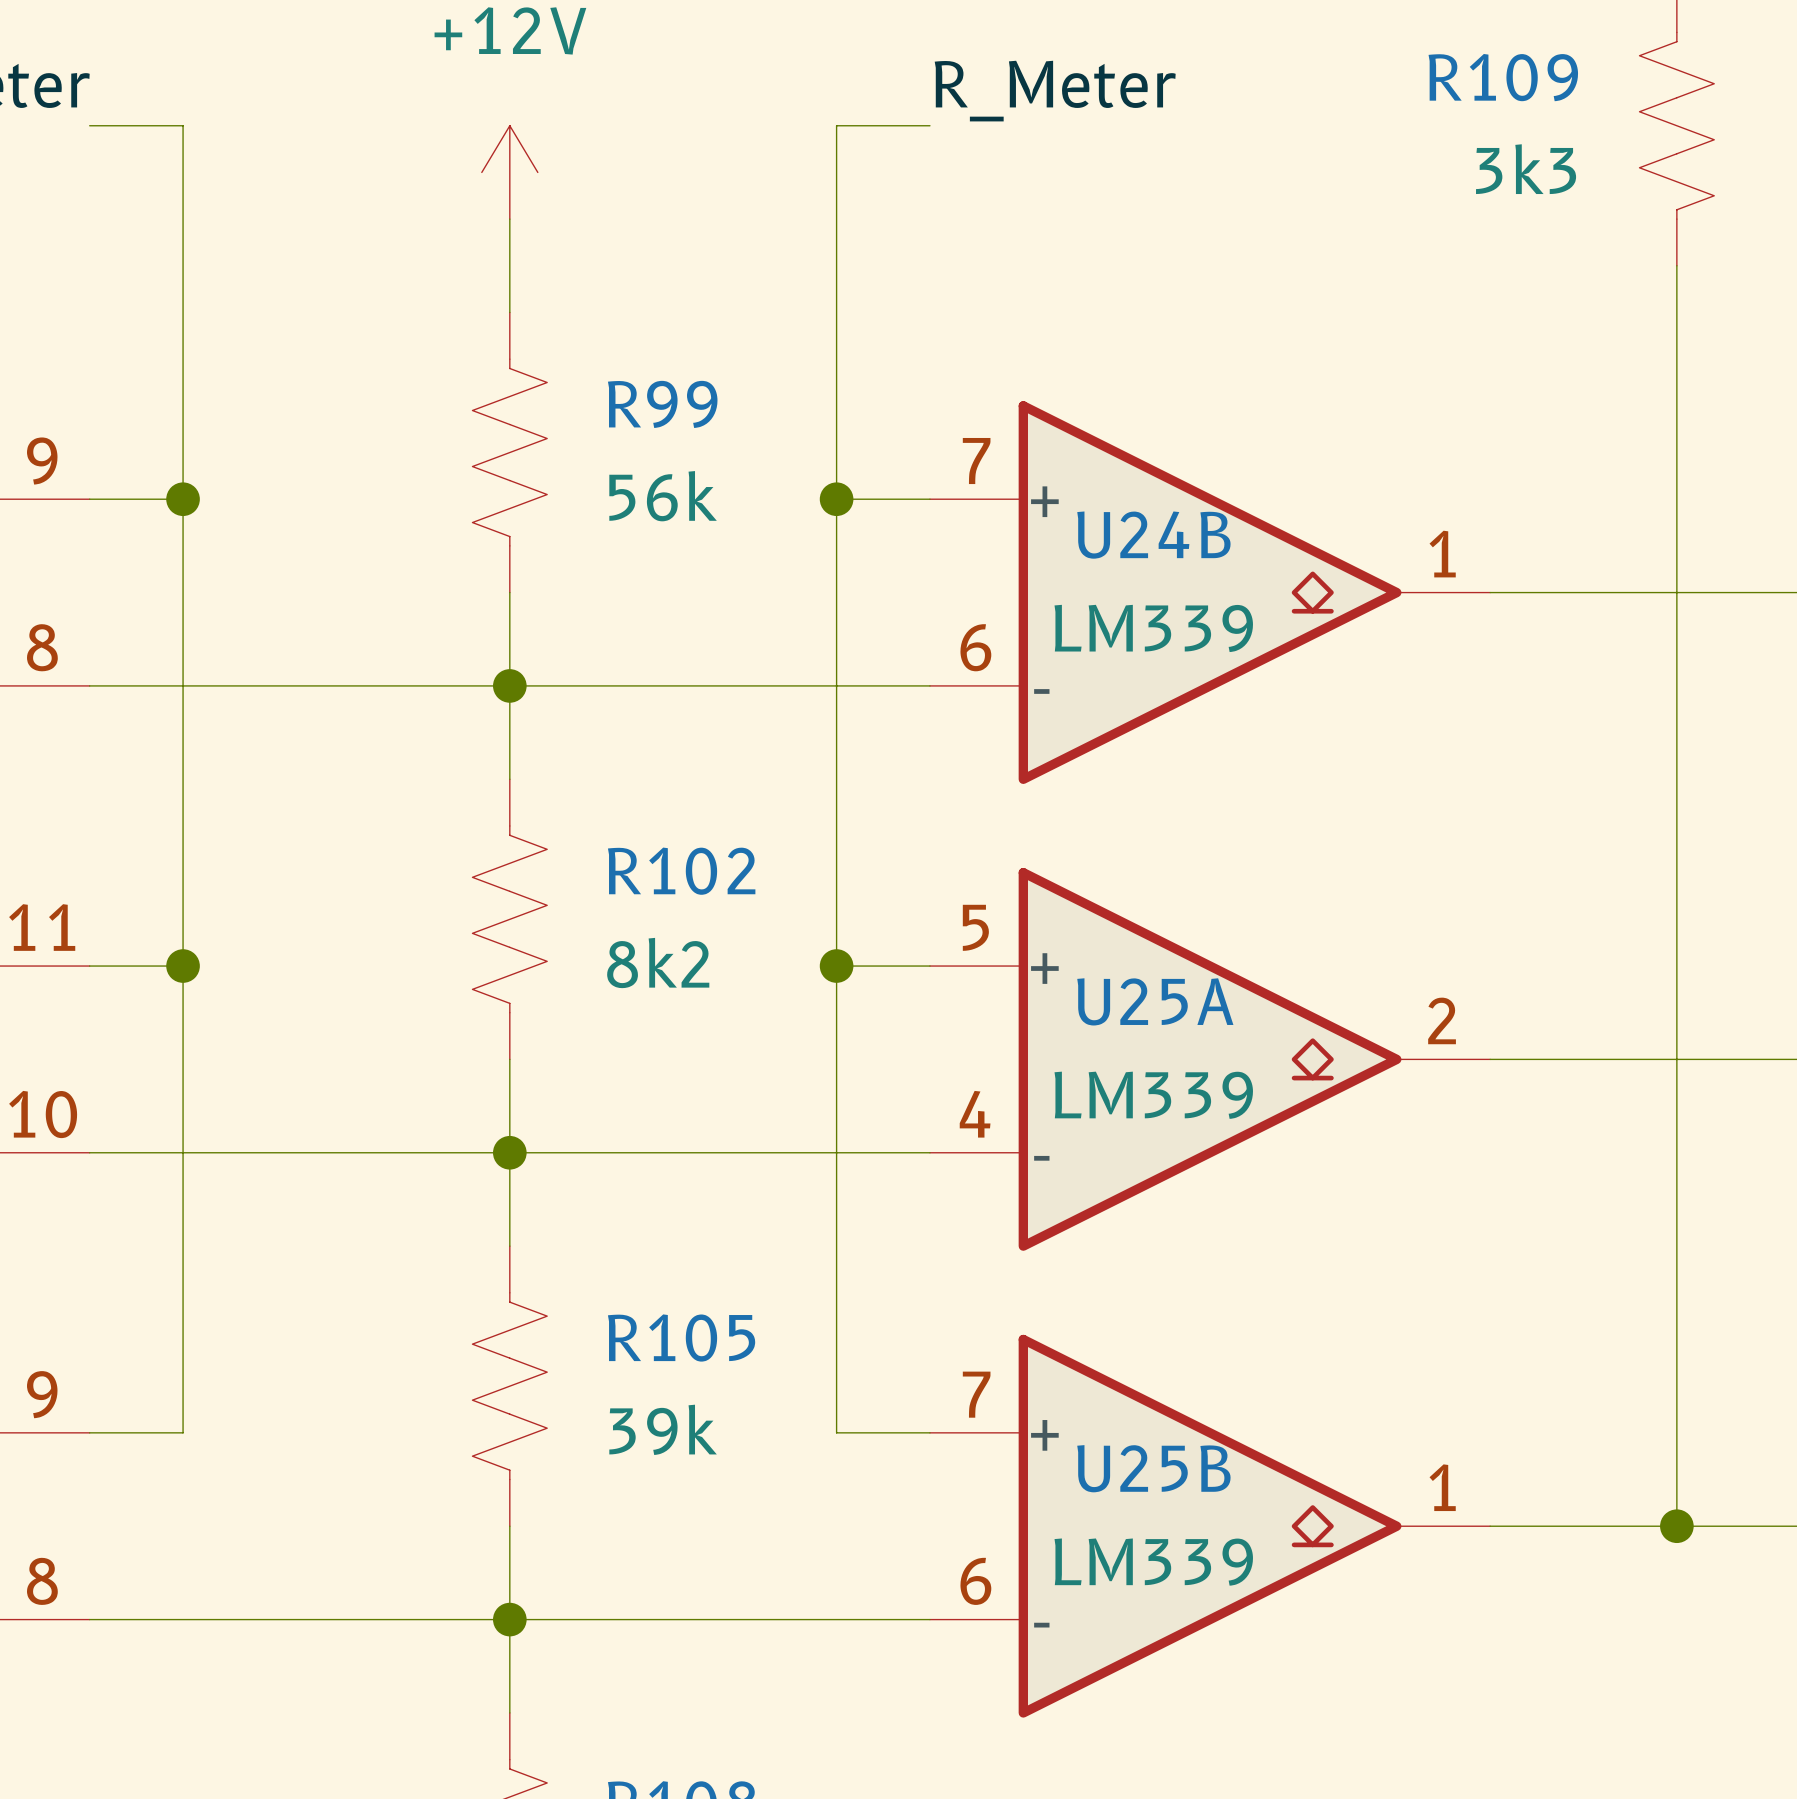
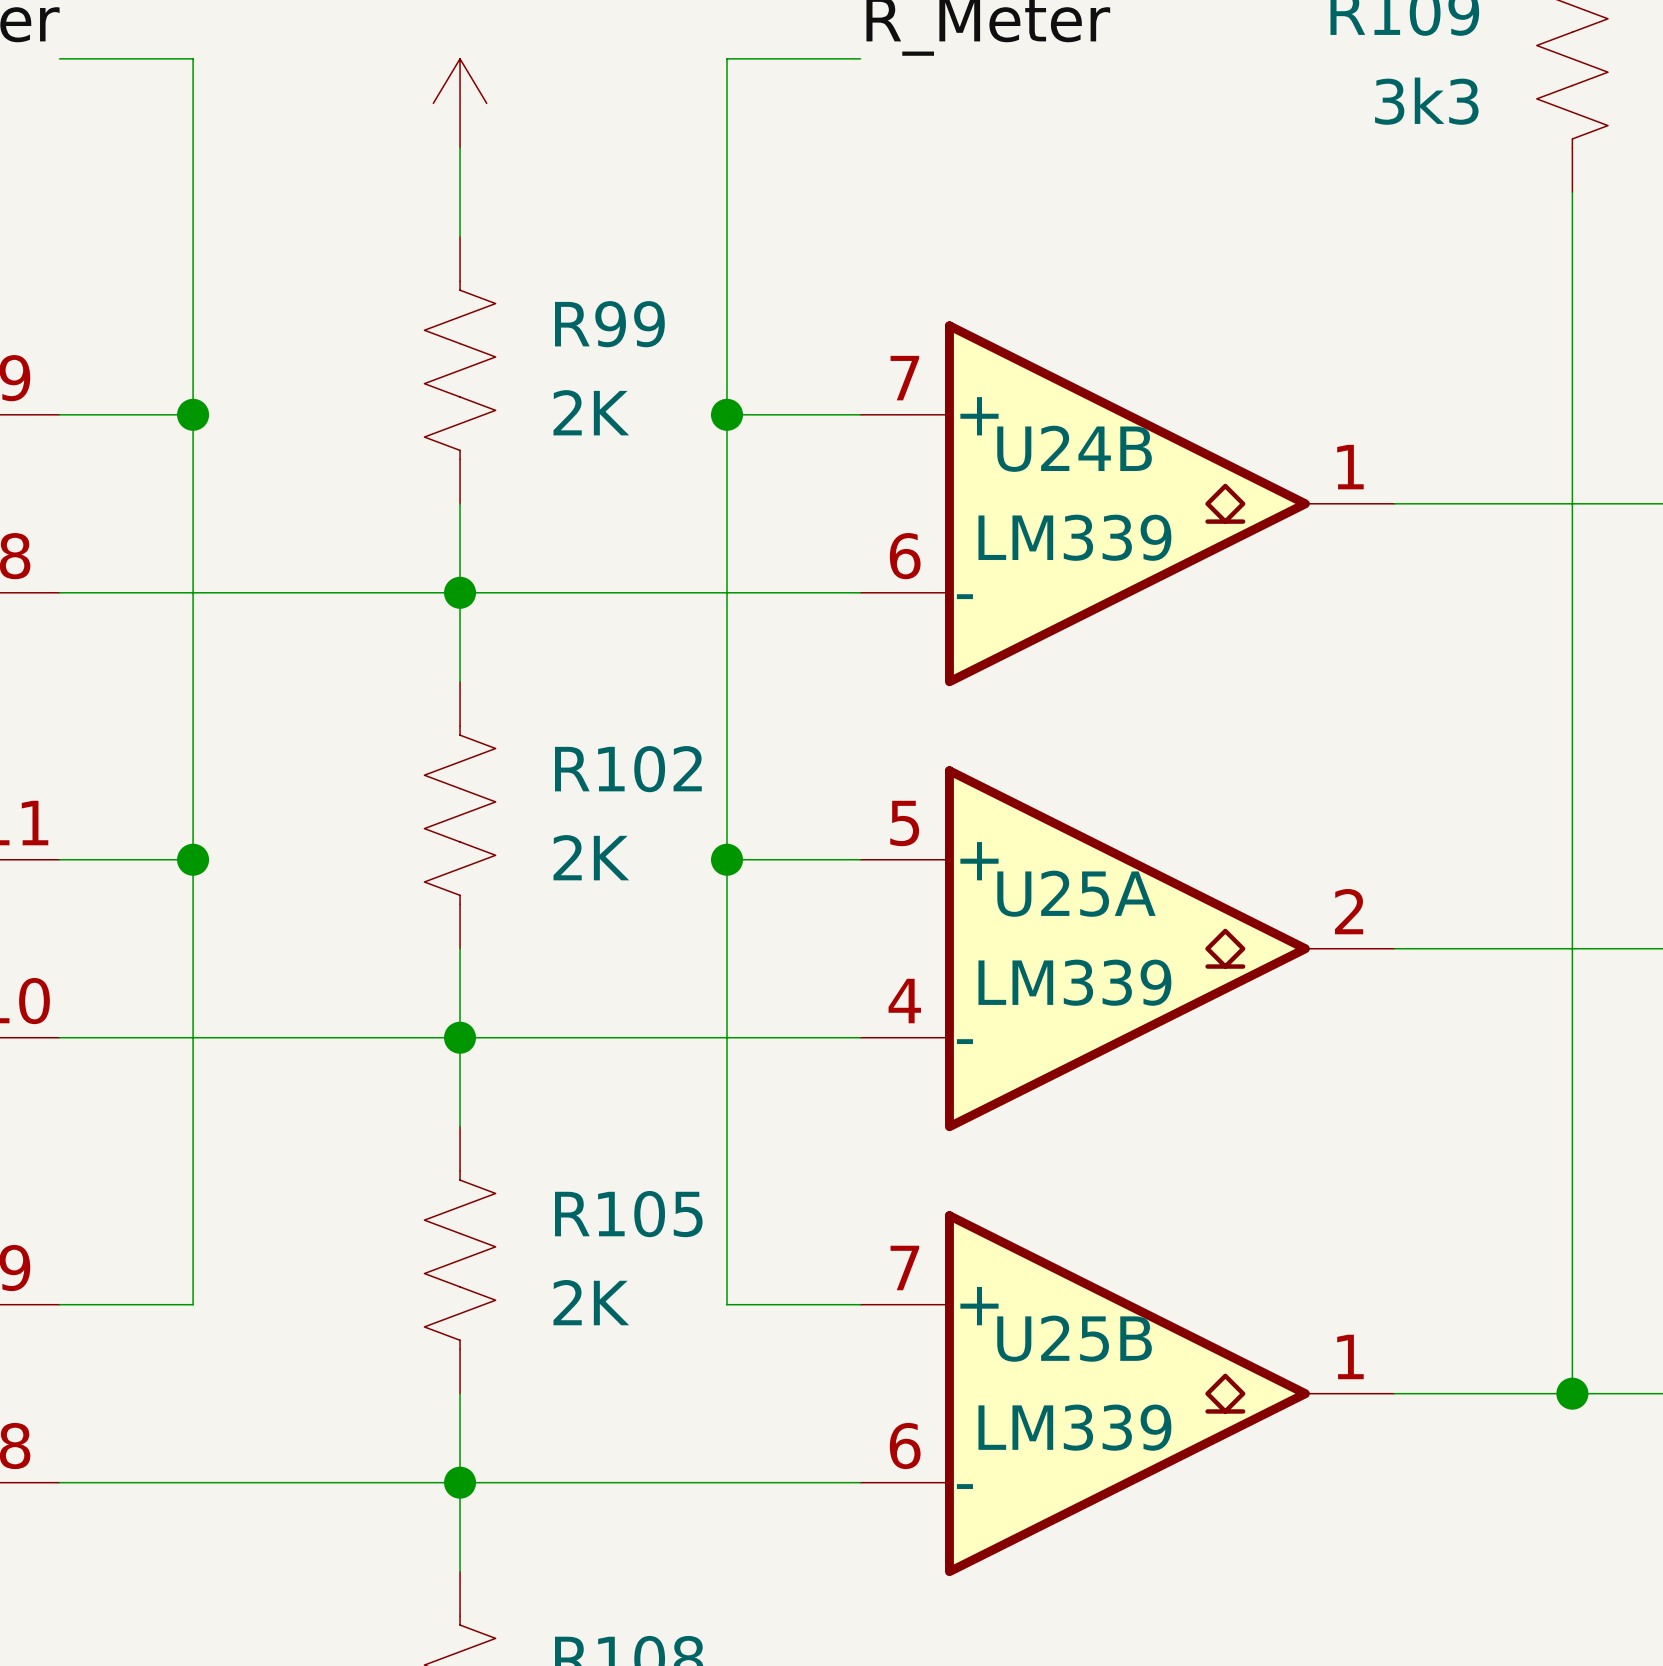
wire: (183, 125) (183, 1432) -> (148, 58) (193, 58) (193, 1304) (148, 1304)
wire: (836, 125) (836, 1432) -> (771, 58) (727, 58) (727, 1304) (771, 1304)
R99 value: 56k (663, 496) -> 2K (591, 412)
wire: none -> (148, 414) (193, 414)
junction position: (183, 499) -> (193, 414)
wire: none -> (727, 414) (771, 414)
junction position: (836, 499) -> (727, 414)
R102 value: 8k2 (658, 963) -> 2K (591, 857)
wire: none -> (148, 859) (193, 859)
junction position: (183, 966) -> (193, 859)
wire: none -> (727, 859) (771, 859)
junction position: (836, 966) -> (727, 859)
R105 value: 39k (663, 1429) -> 2K (591, 1302)

